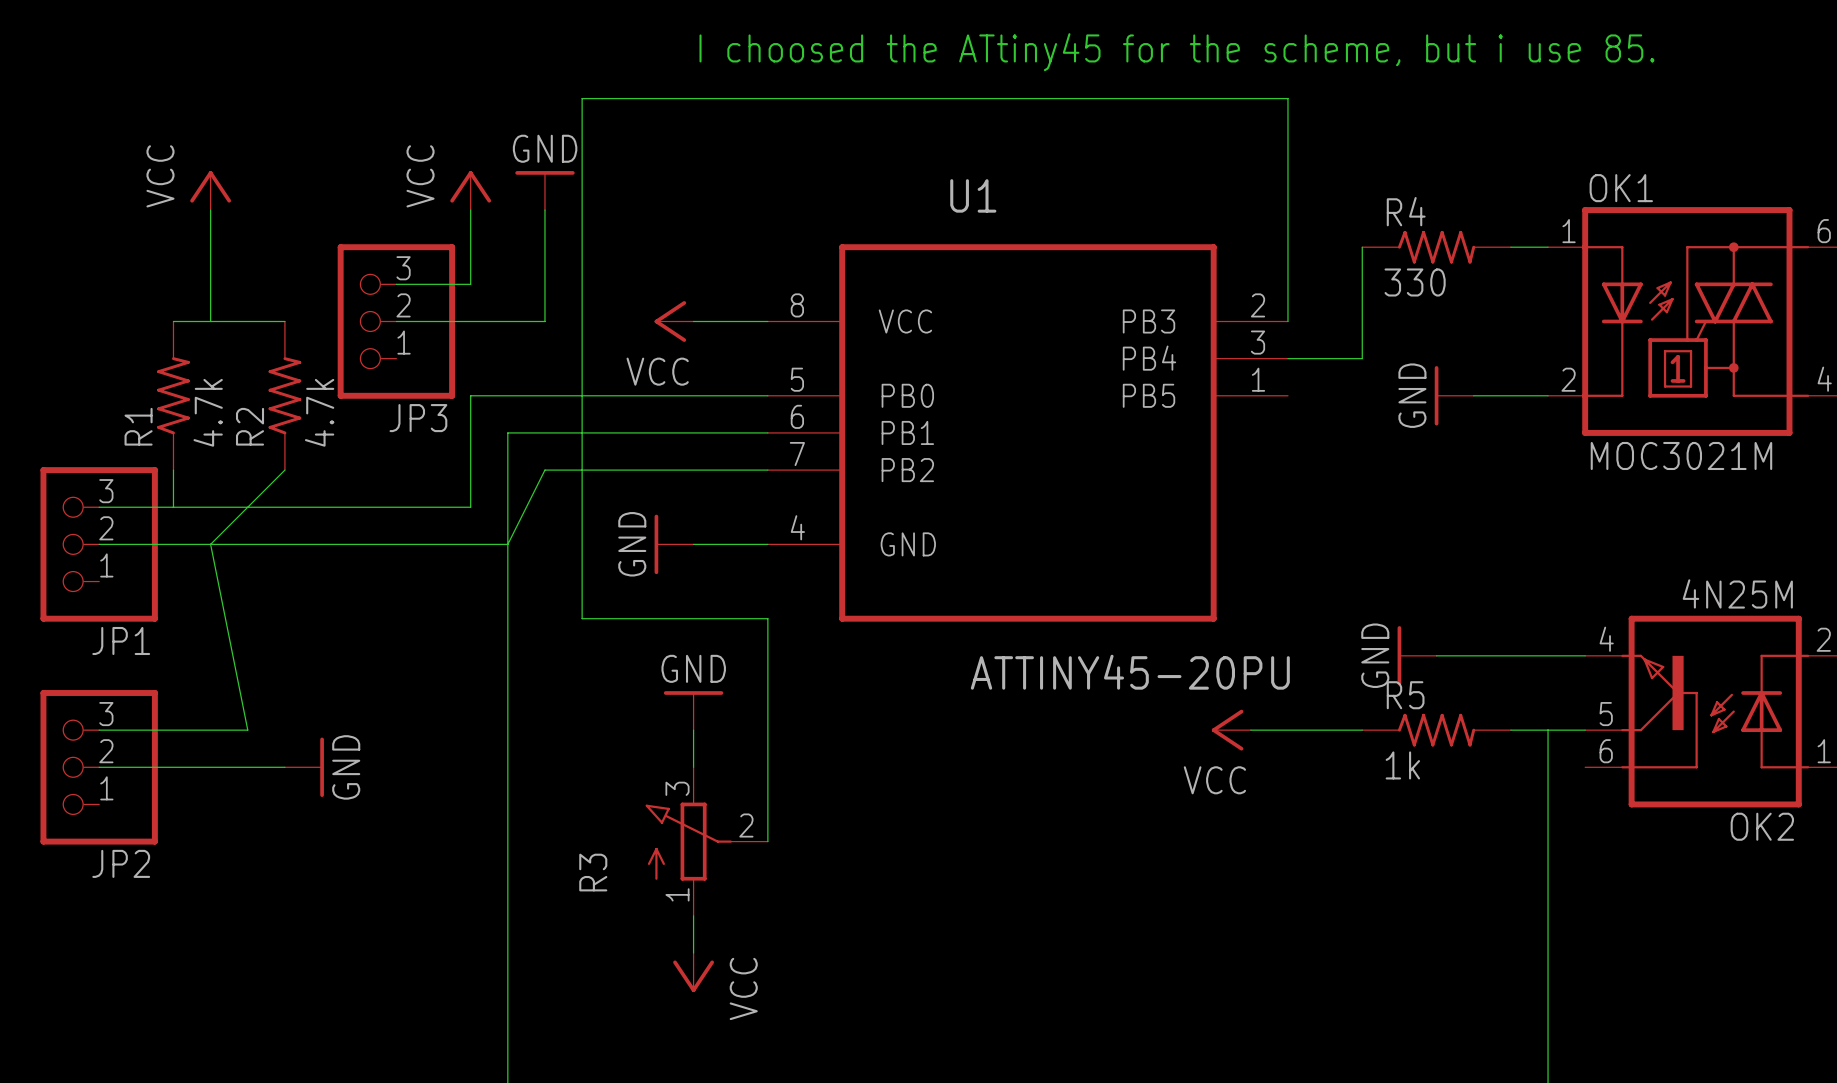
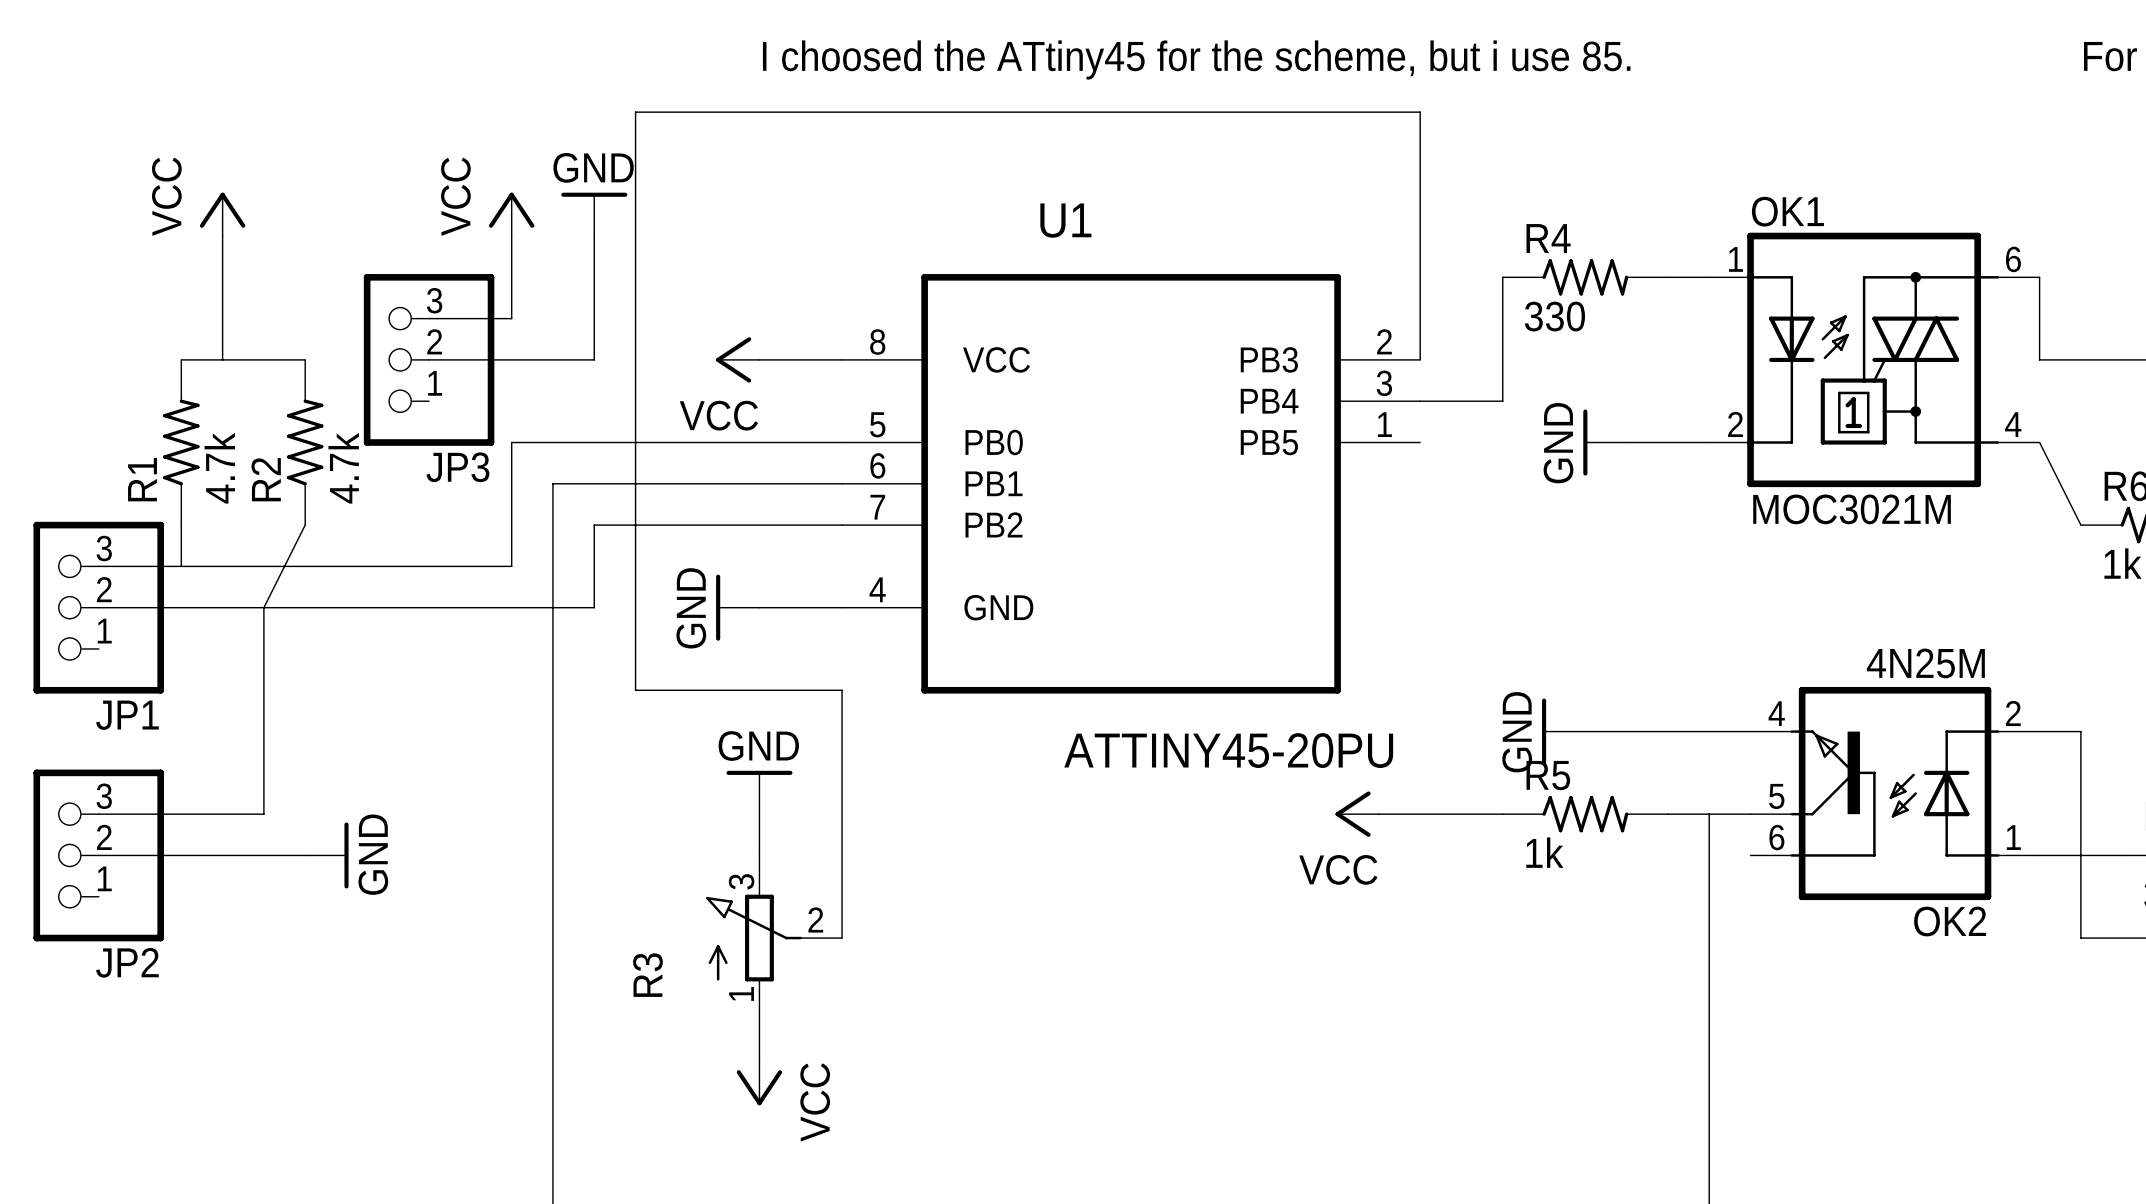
wire: (284, 470) (210, 544) (247, 730) -> (305, 525) (263, 607) (263, 814)
wire: (544, 470) (507, 544) -> (594, 525) (594, 607) (552, 607)

